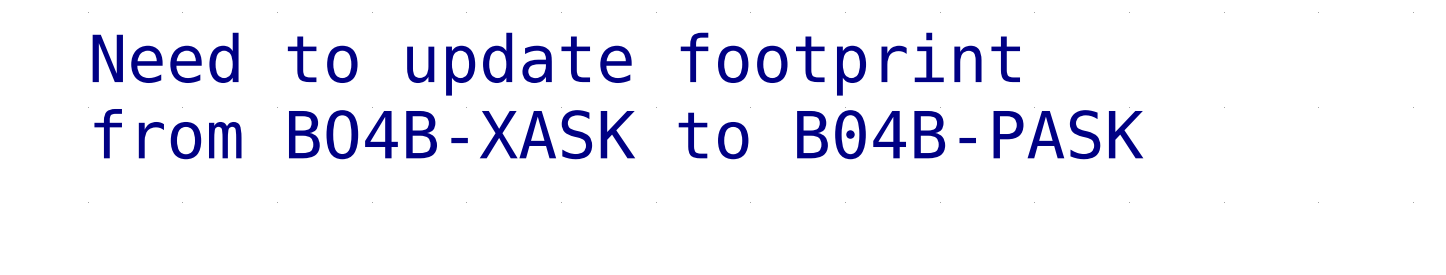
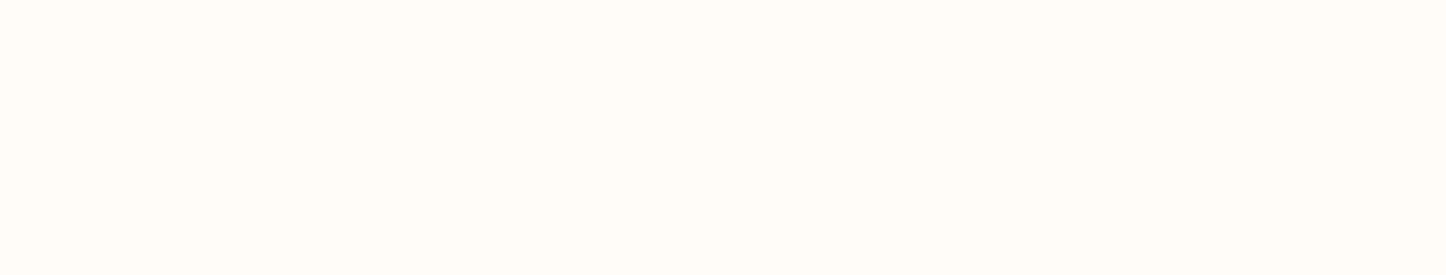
text: Need to update footprint (556, 64) -> none
text: from BO4B-XASK to B04B-PASK (618, 134) -> none

